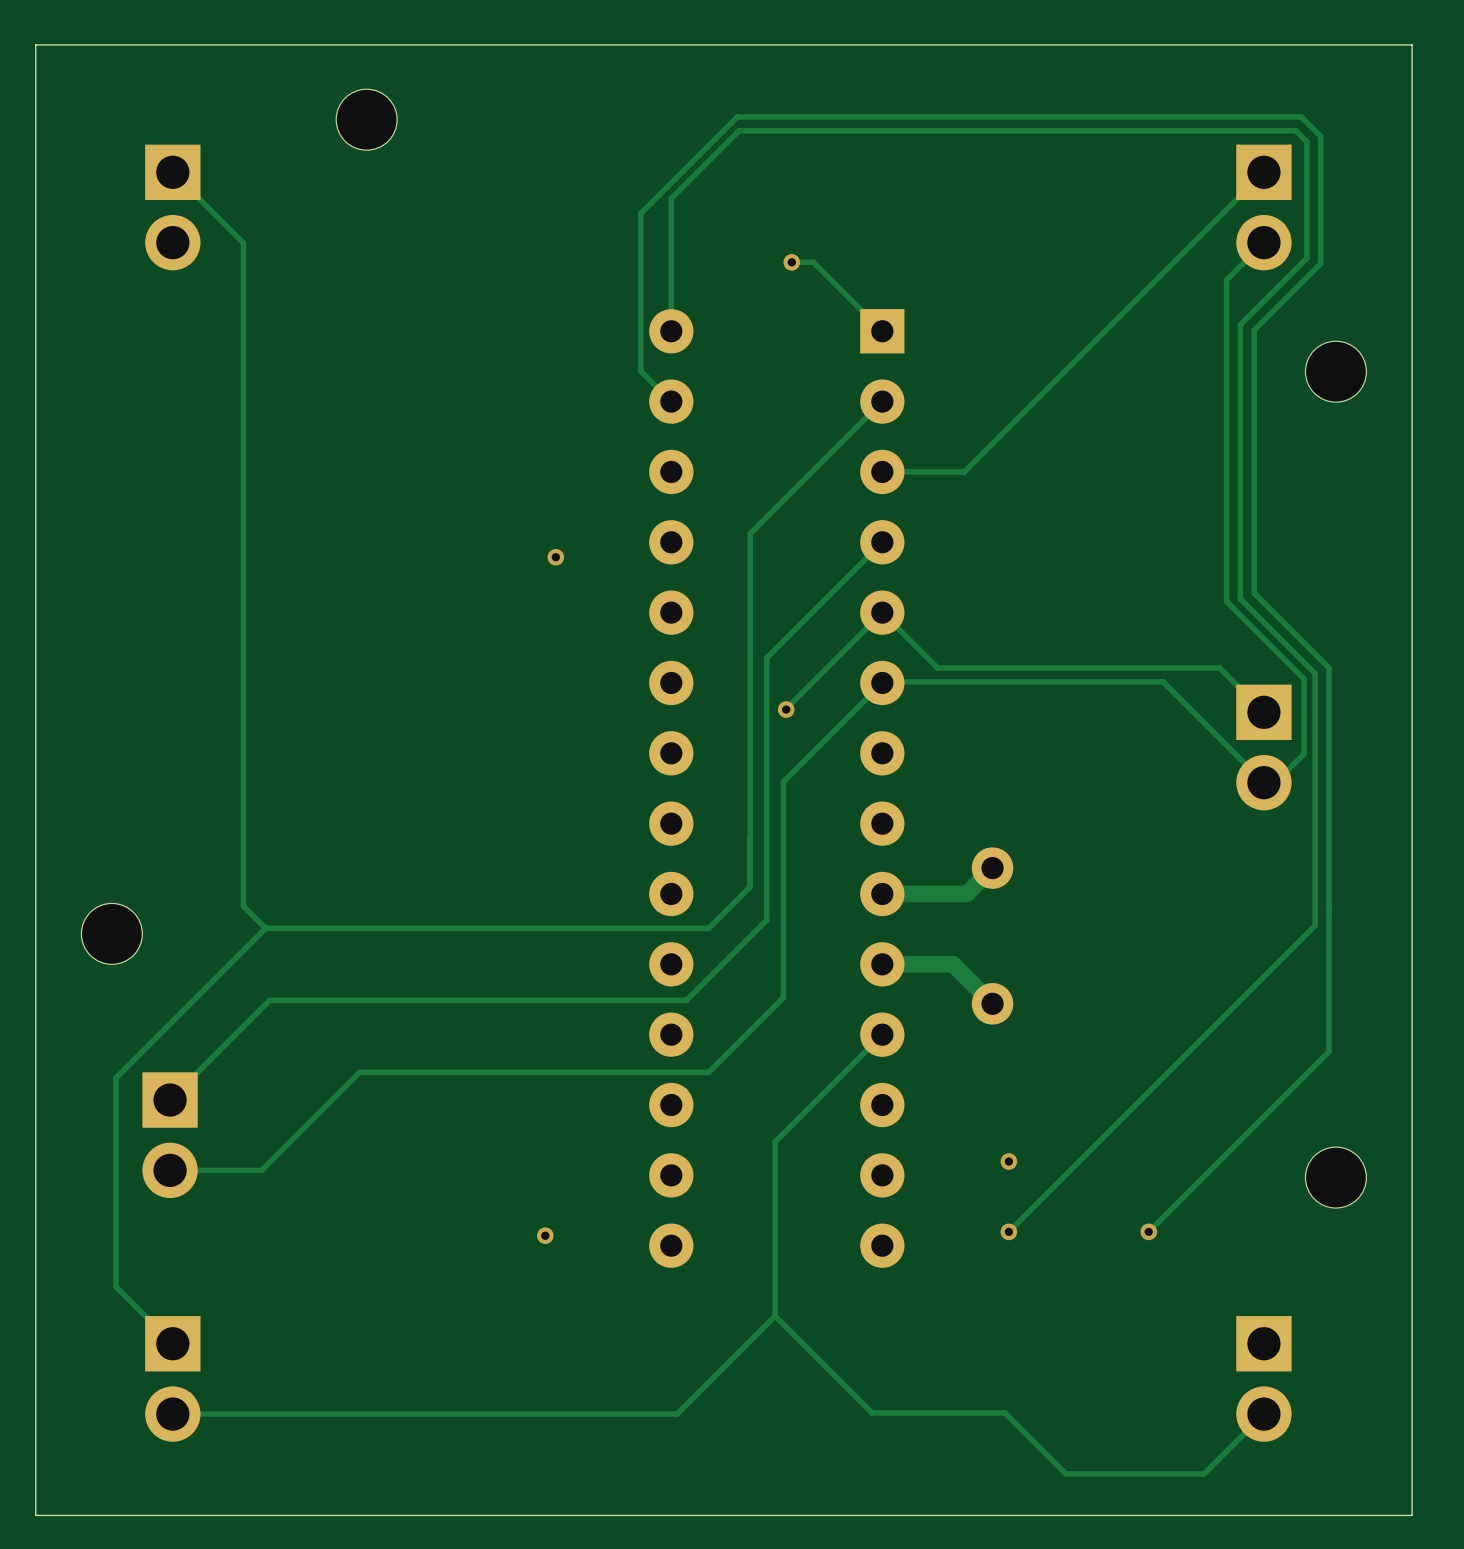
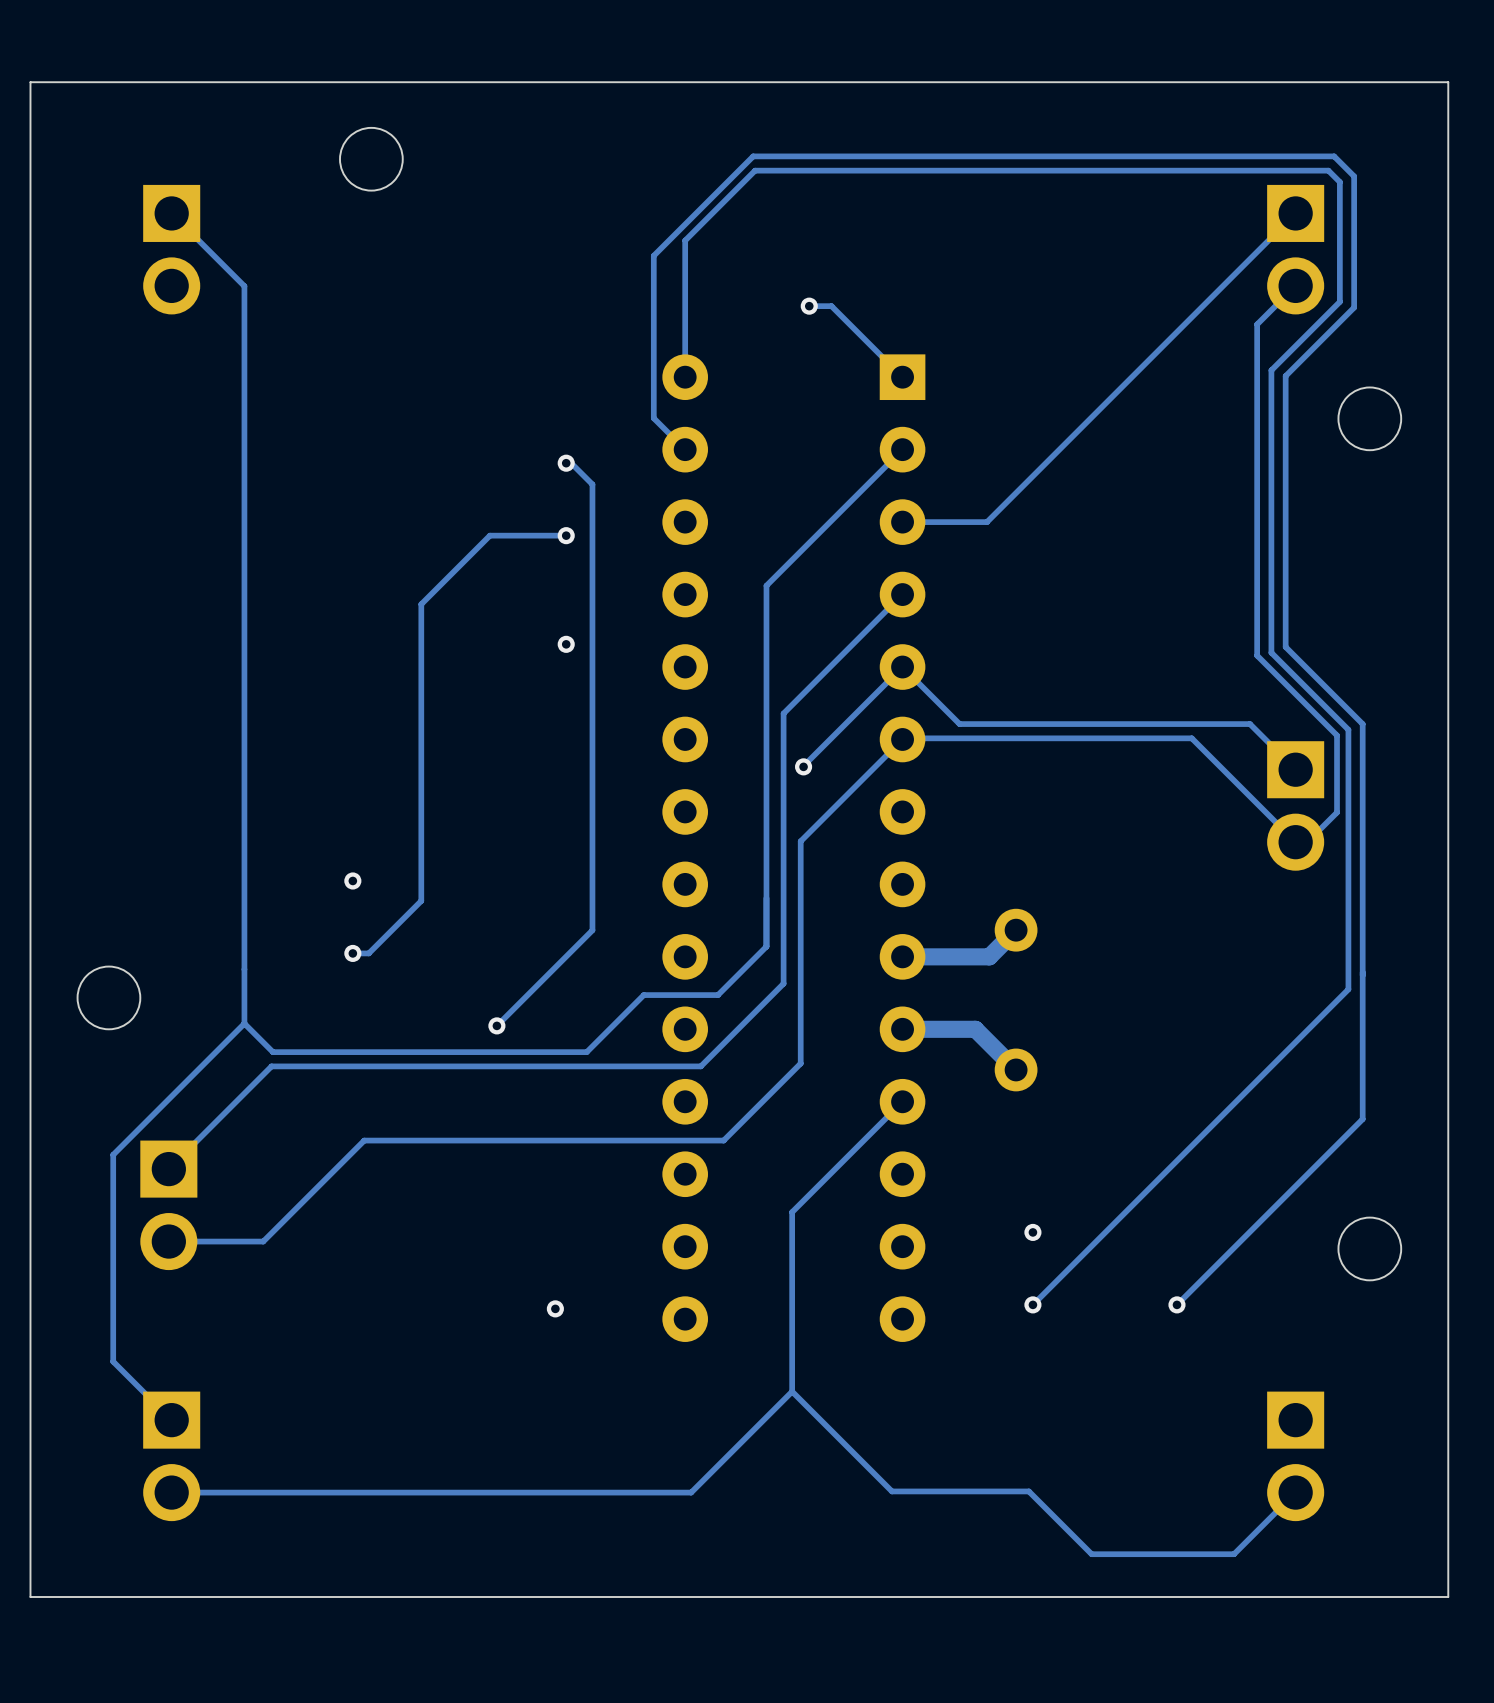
track: none -> (566, 463) (571, 463) (592, 484) (592, 930) (496, 1025)
via: none -> (566, 463)
track: none -> (566, 535) (489, 535) (421, 604) (421, 900) (368, 953) (352, 953)
via: none -> (566, 535)
via position: (555, 557) -> (566, 644)
via: none -> (352, 880)
track: (750, 884) (750, 886) (708, 928) (265, 928) -> (766, 946) (717, 995) (643, 995) (586, 1052) (272, 1052) (244, 1023)
via: none -> (352, 953)
track: (243, 906) (265, 928) -> (244, 969) (244, 1023)
track: (265, 928) (116, 1077) (116, 1086) -> (244, 1023) (113, 1154)
via: none -> (496, 1025)

